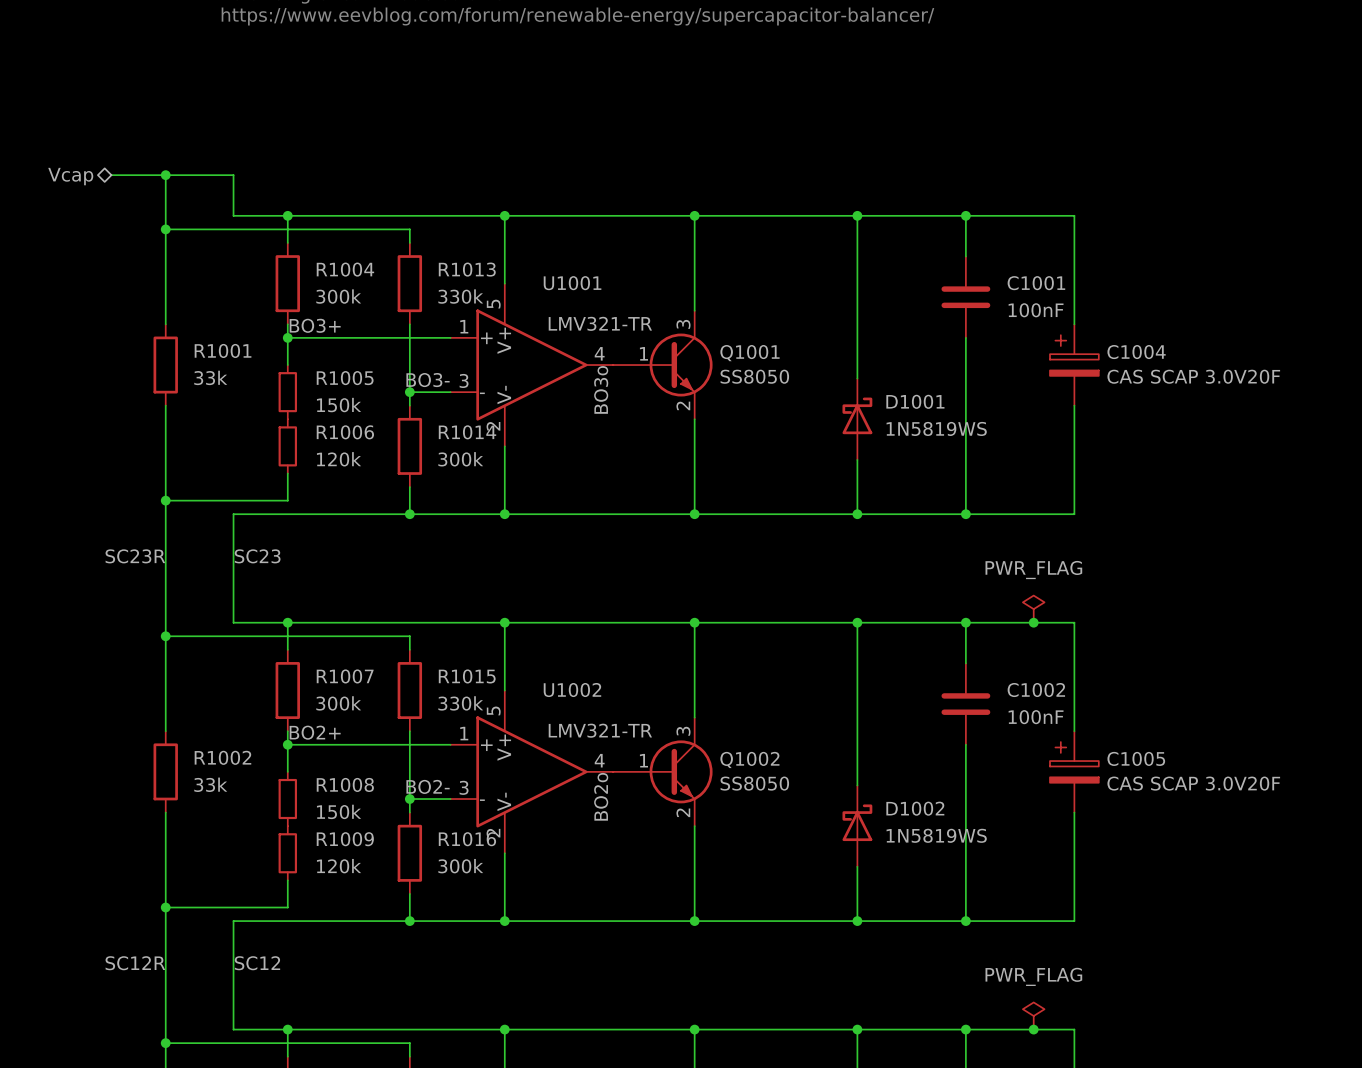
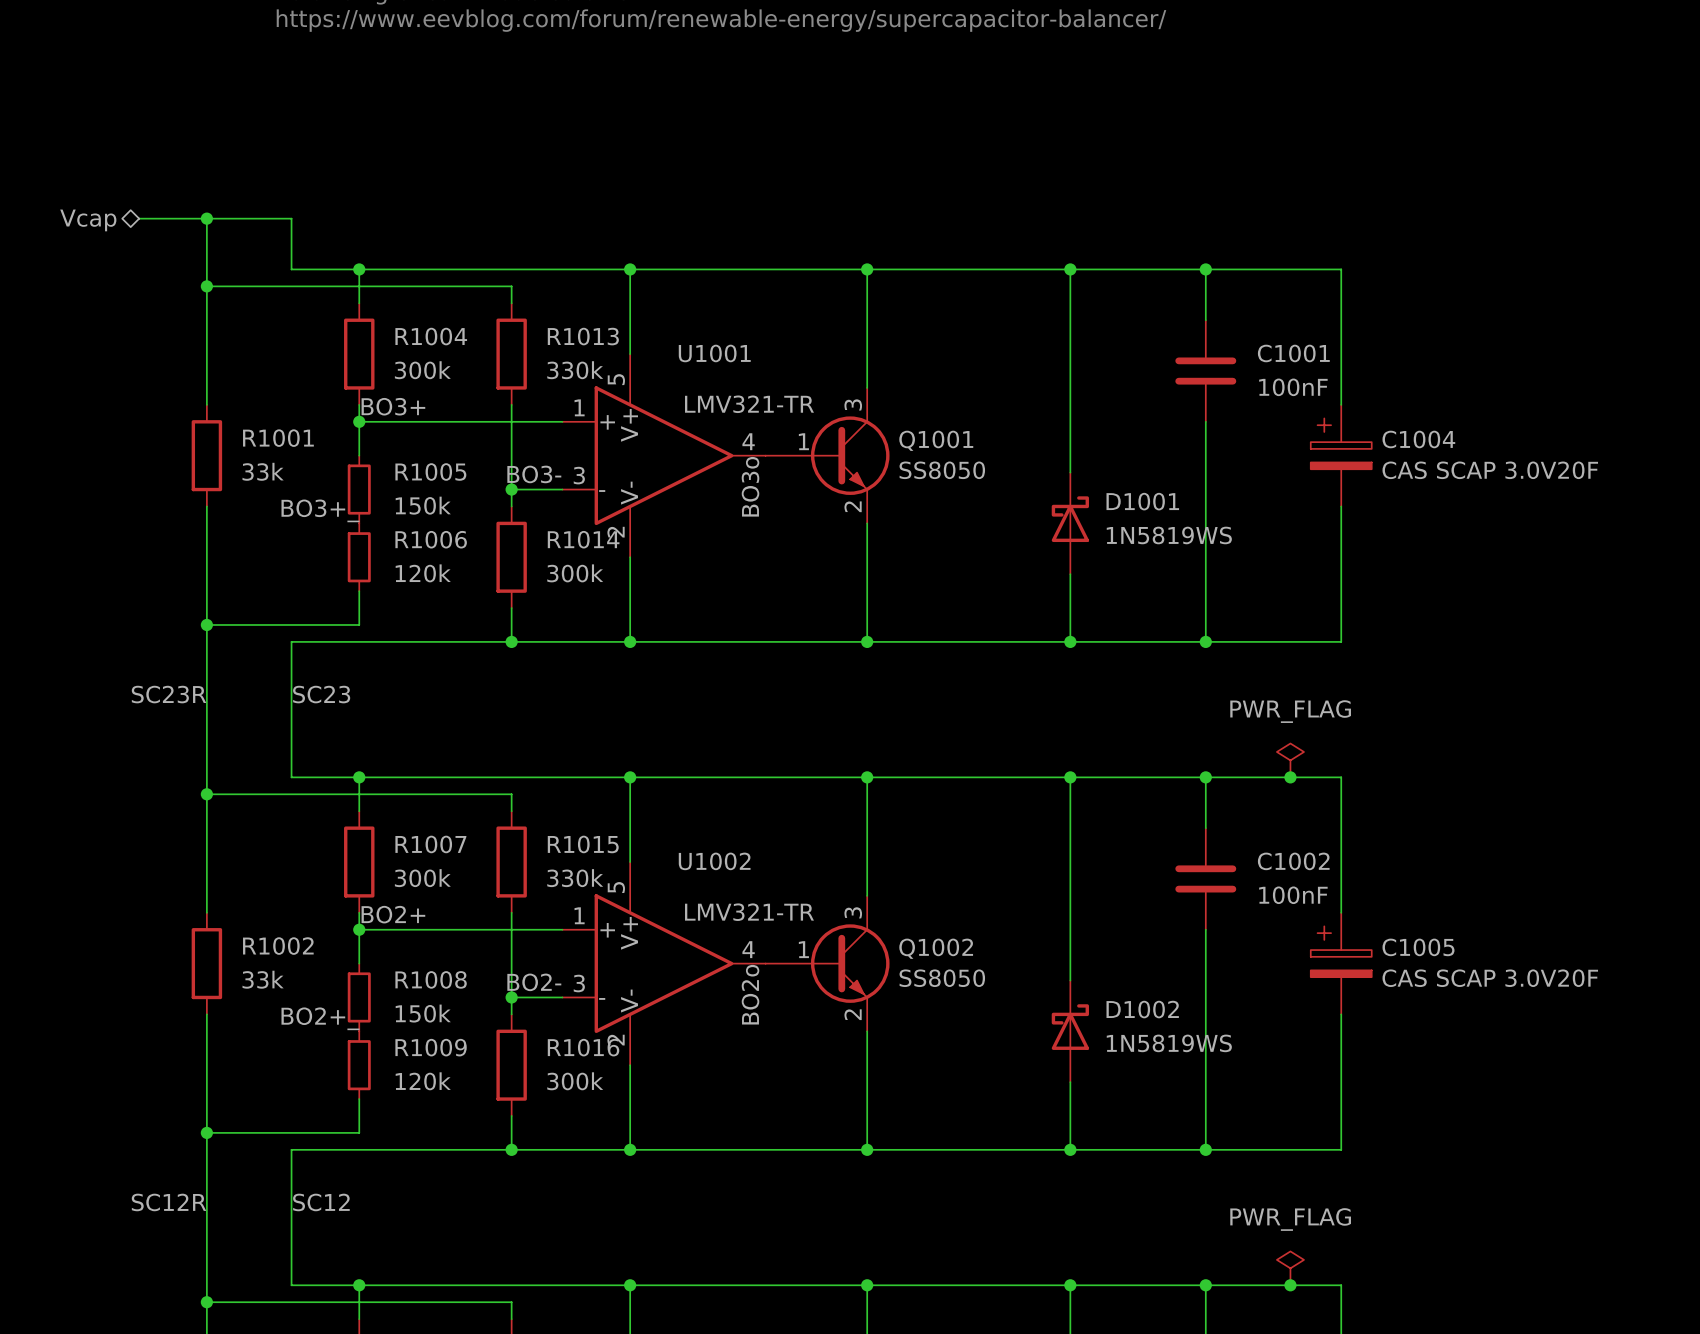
label: none -> BO3+_ (320, 510)
label: none -> BO2+_ (320, 1018)

